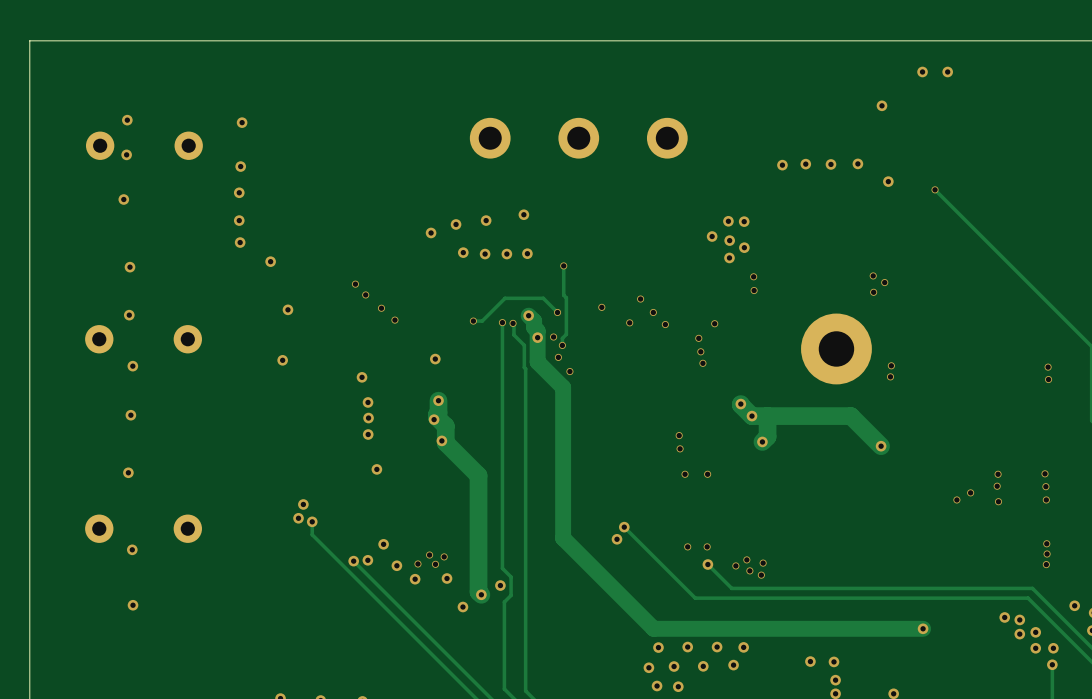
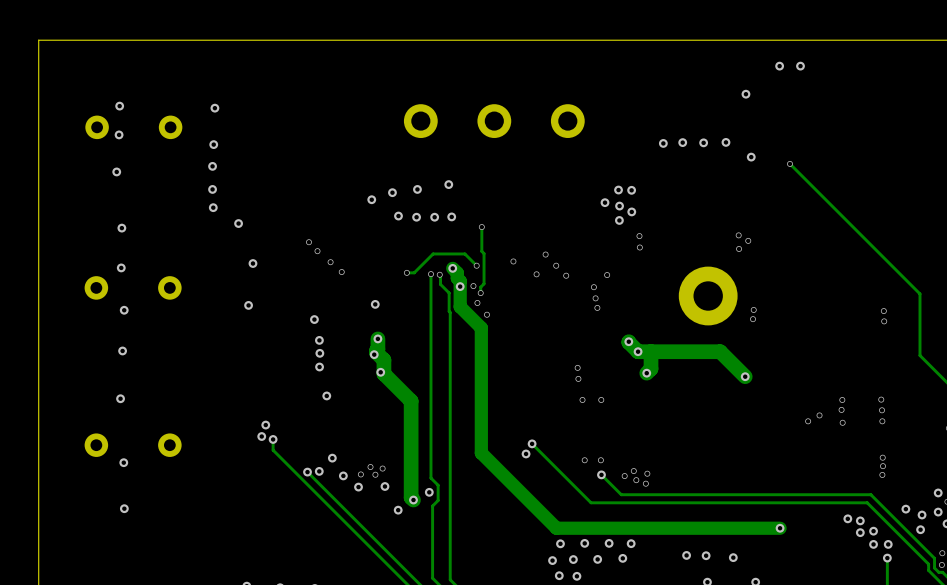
via: none -> (733, 557)
via: (835, 680) -> none

